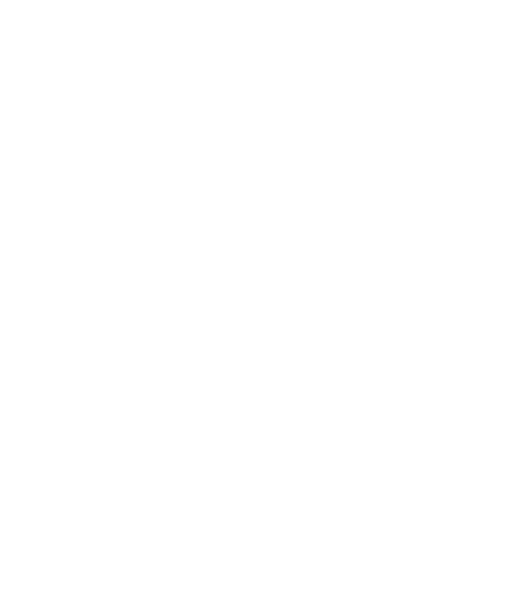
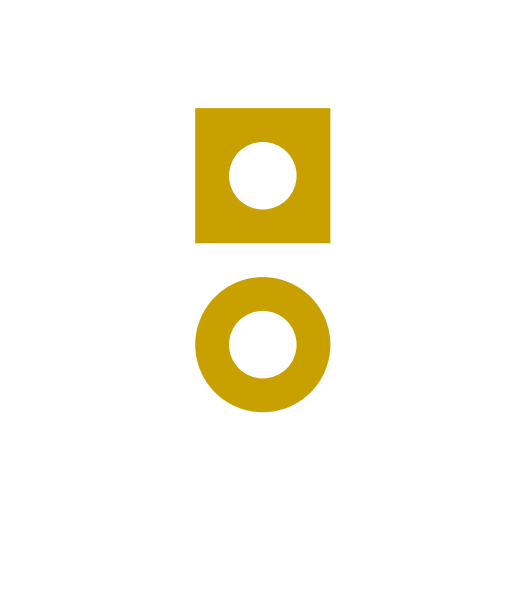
part: none -> (262, 260)

